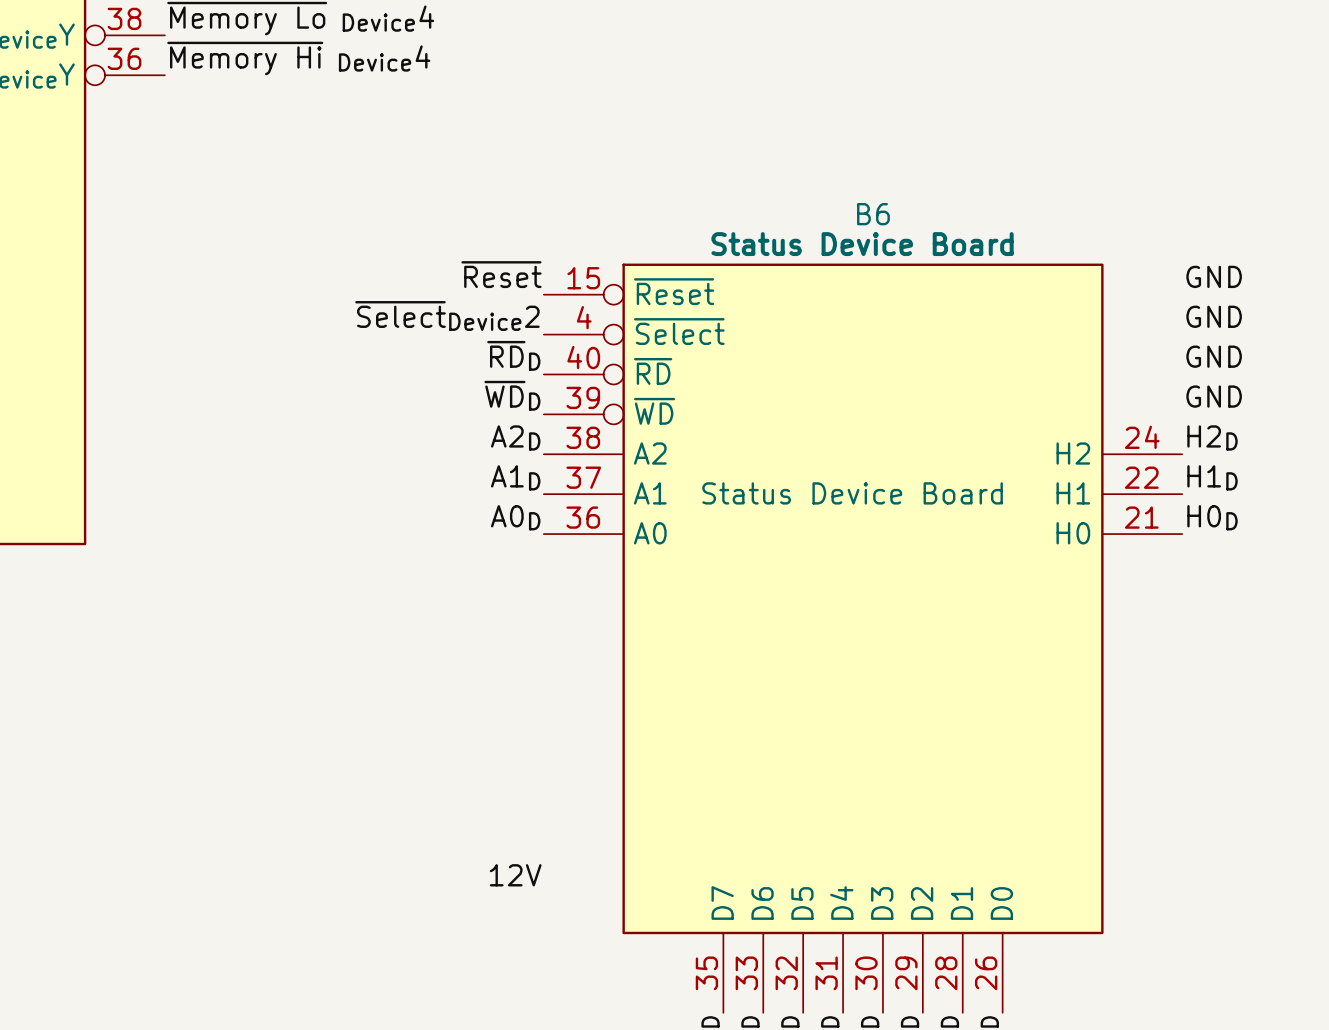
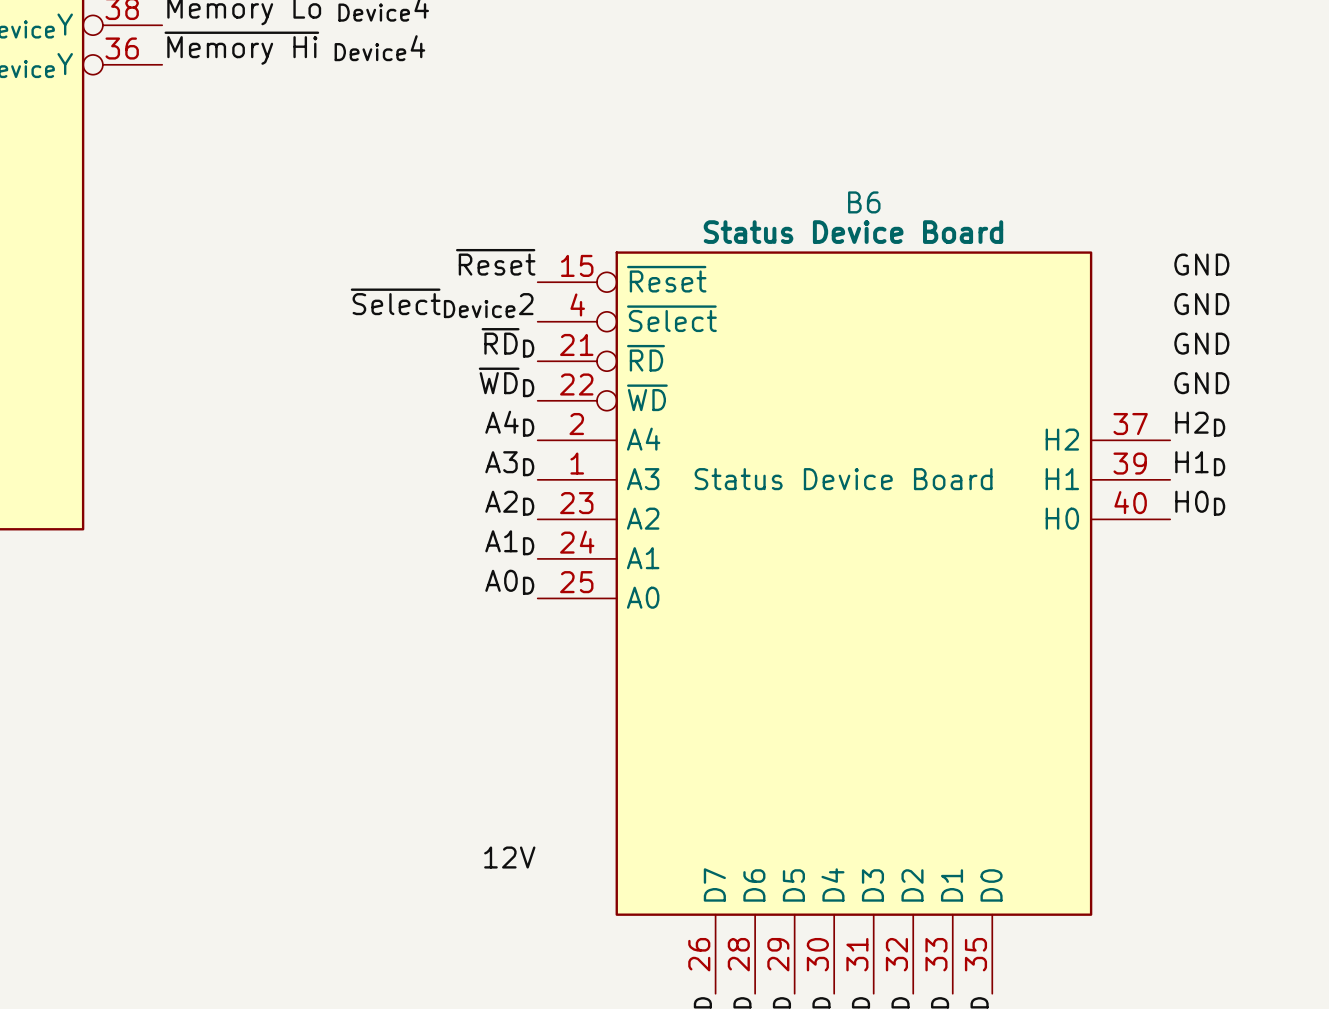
B6 symbol: [543, 263, 1183, 1013] -> [537, 251, 1171, 994]
label: A2D (515, 437) -> A4D (509, 423)
label: A1D (515, 477) -> A3D (509, 463)
label: A0D (515, 517) -> A2D (509, 503)
label: none -> A1D (509, 542)
label: none -> A0D (509, 582)

